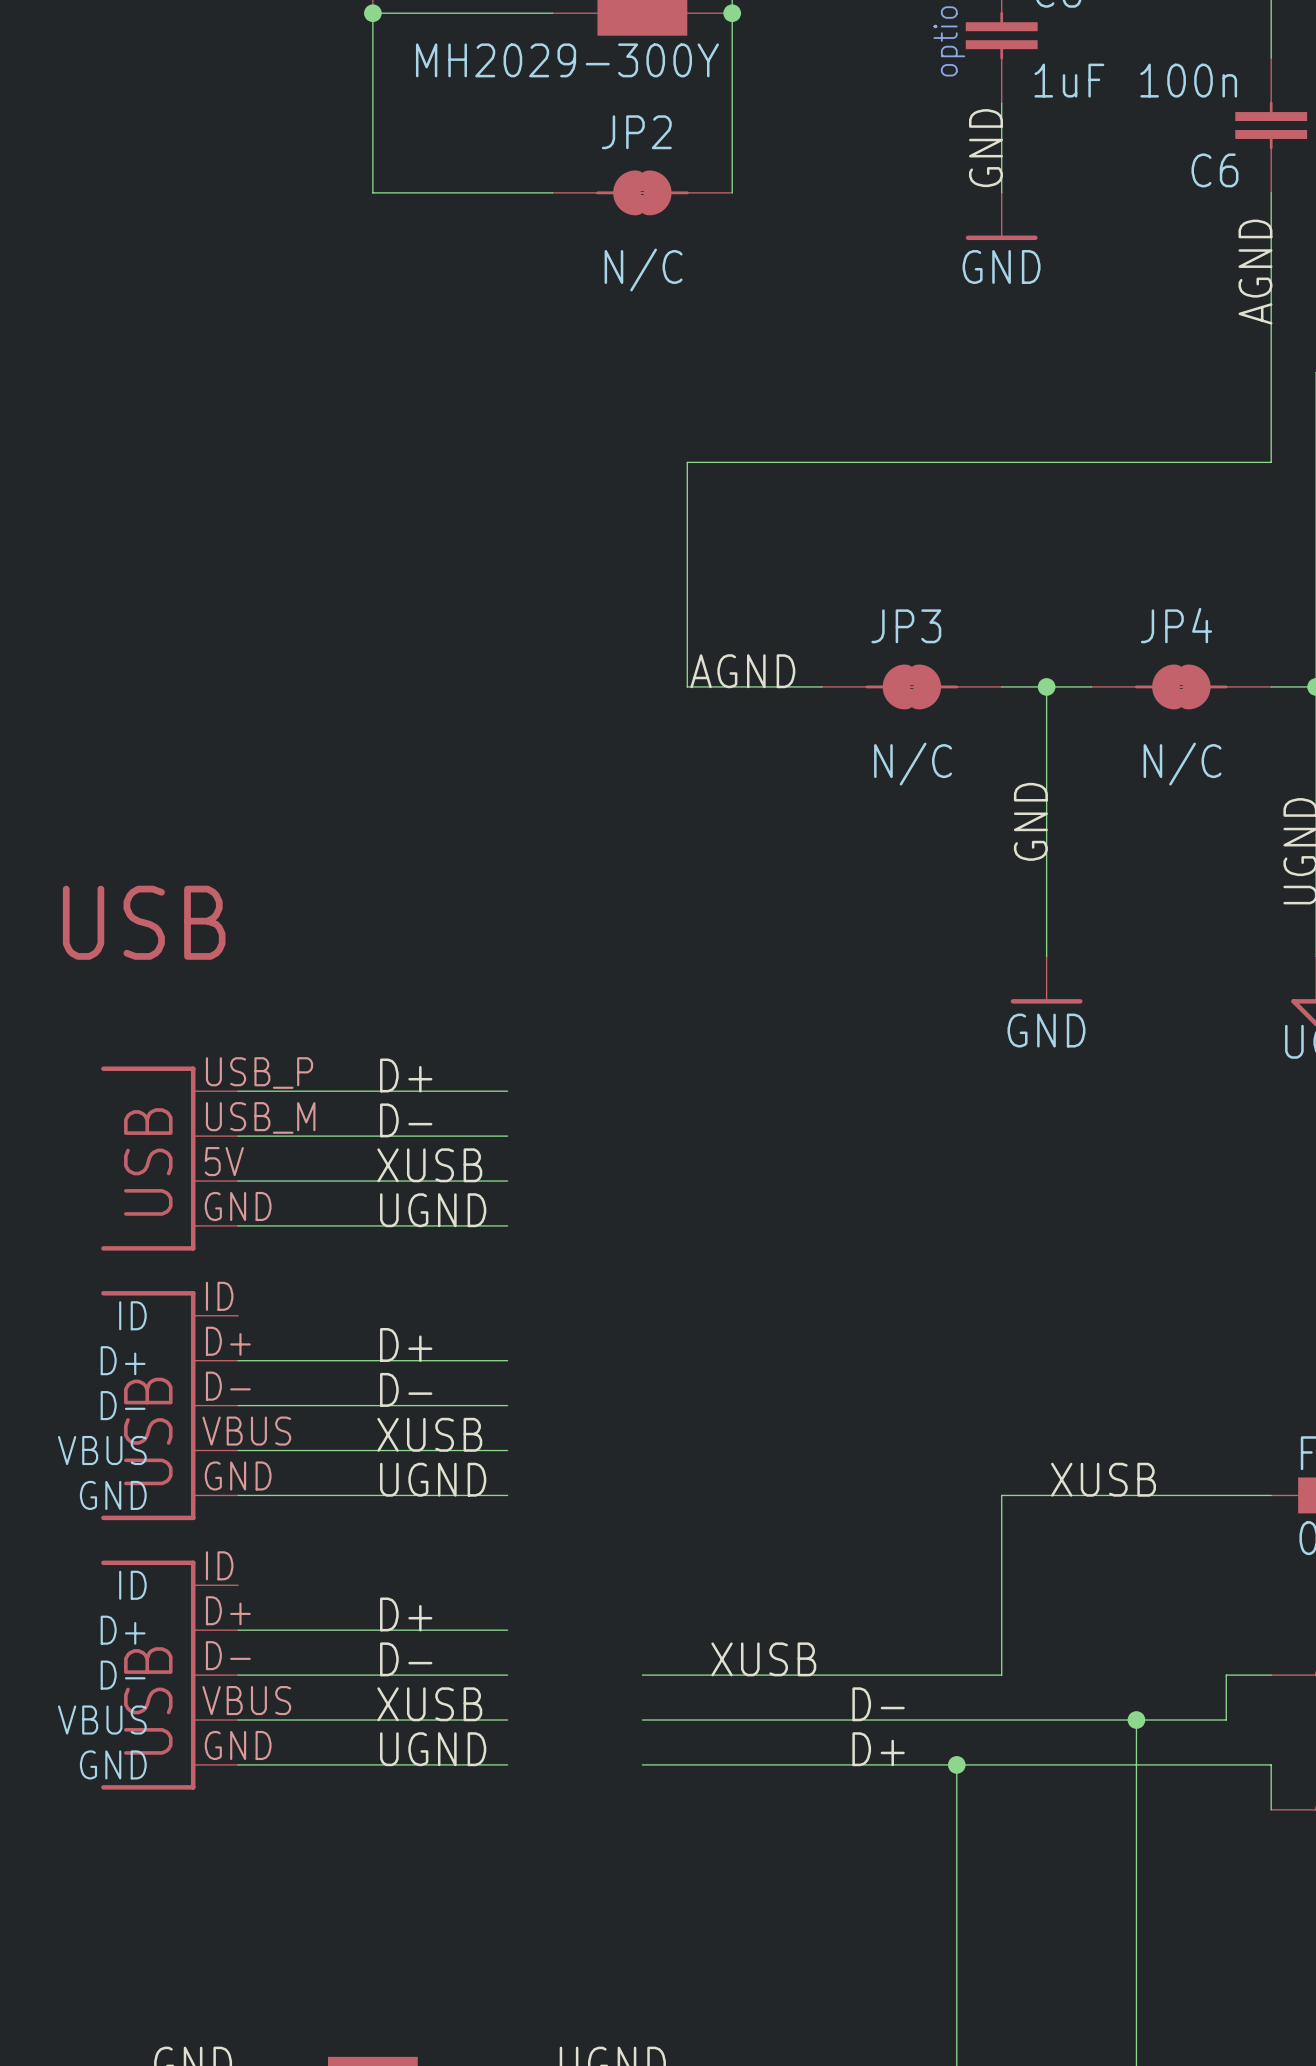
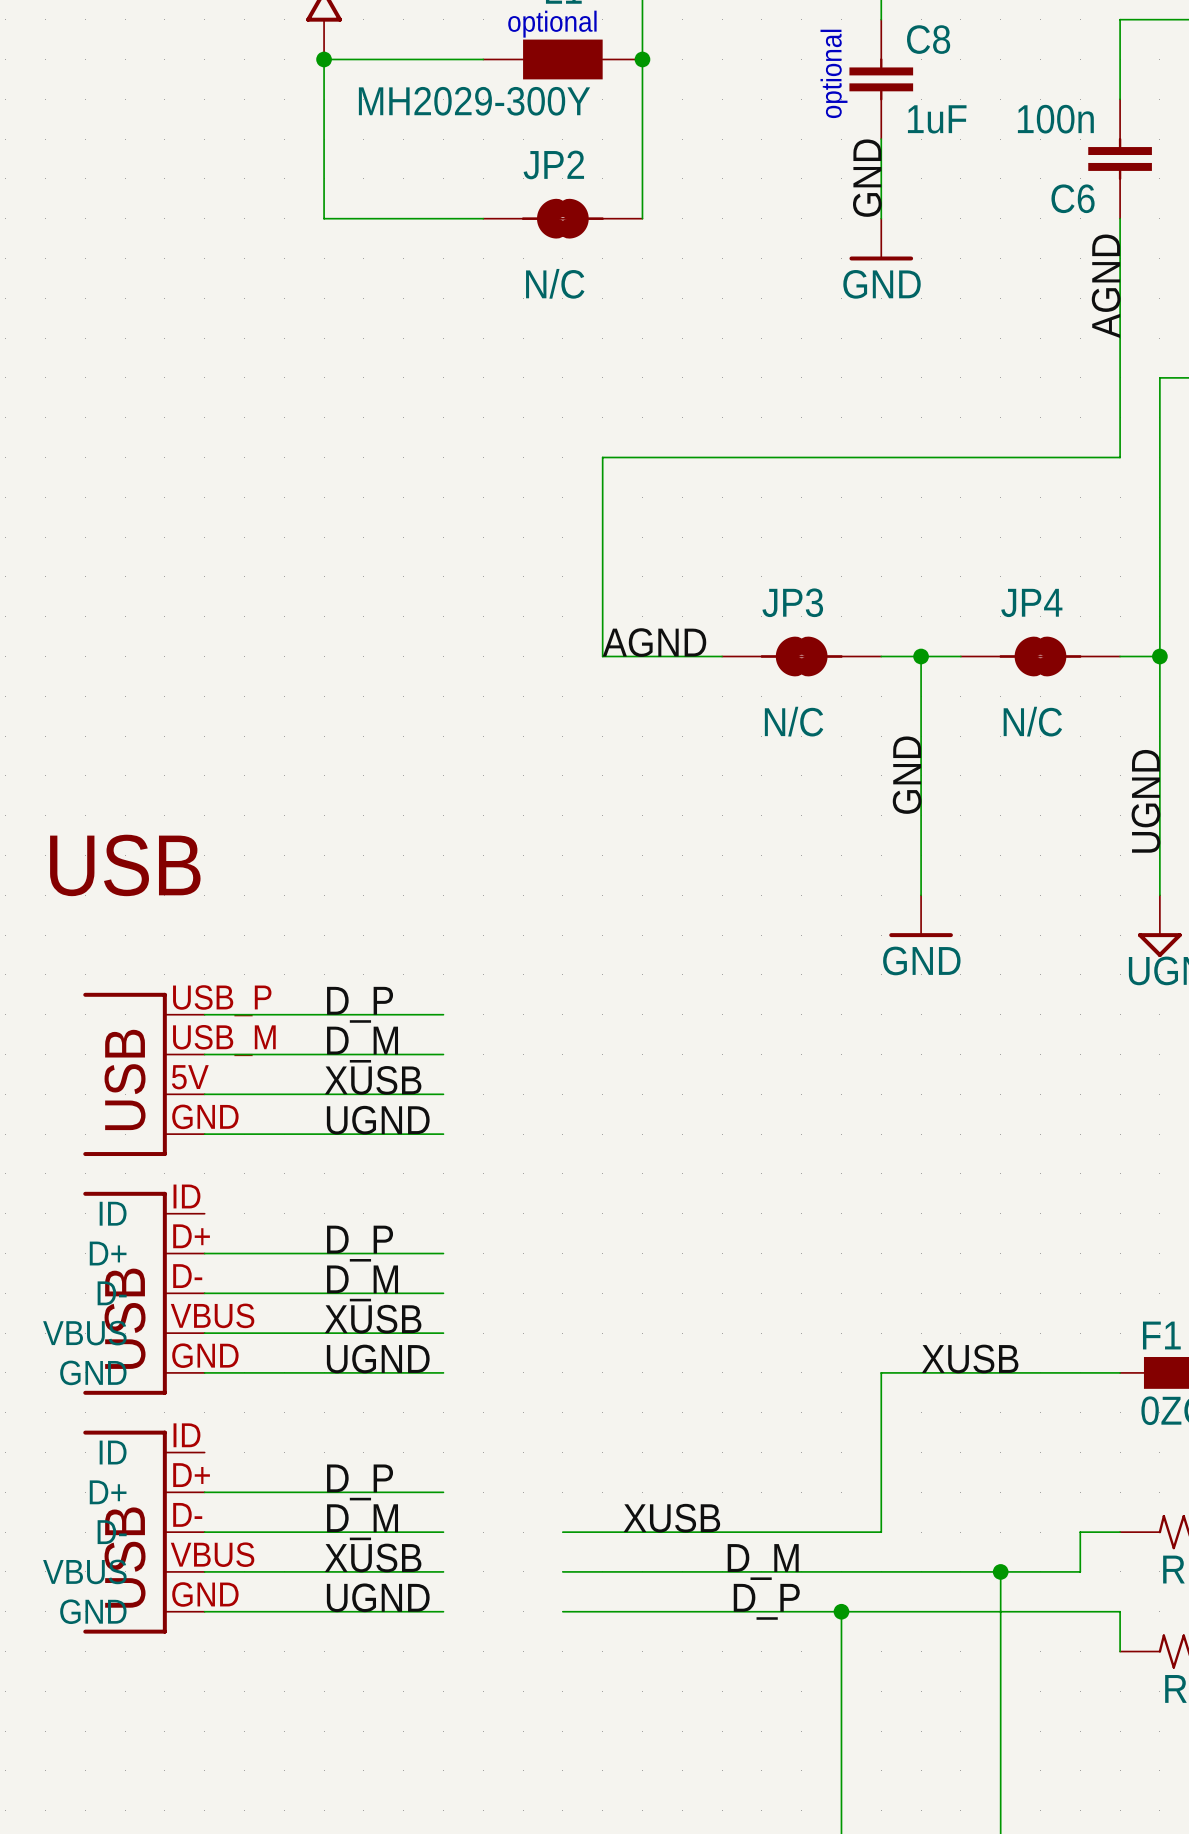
label: D+ (406, 1075) -> D_P (360, 1004)
label: D- (406, 1120) -> D_M (362, 1044)
label: D+ (406, 1344) -> D_P (360, 1243)
label: D- (406, 1389) -> D_M (362, 1283)
label: D+ (406, 1614) -> D_P (360, 1482)
label: D- (406, 1659) -> D_M (362, 1522)
label: D- (878, 1704) -> D_M (763, 1562)
label: D+ (878, 1749) -> D_P (766, 1601)

